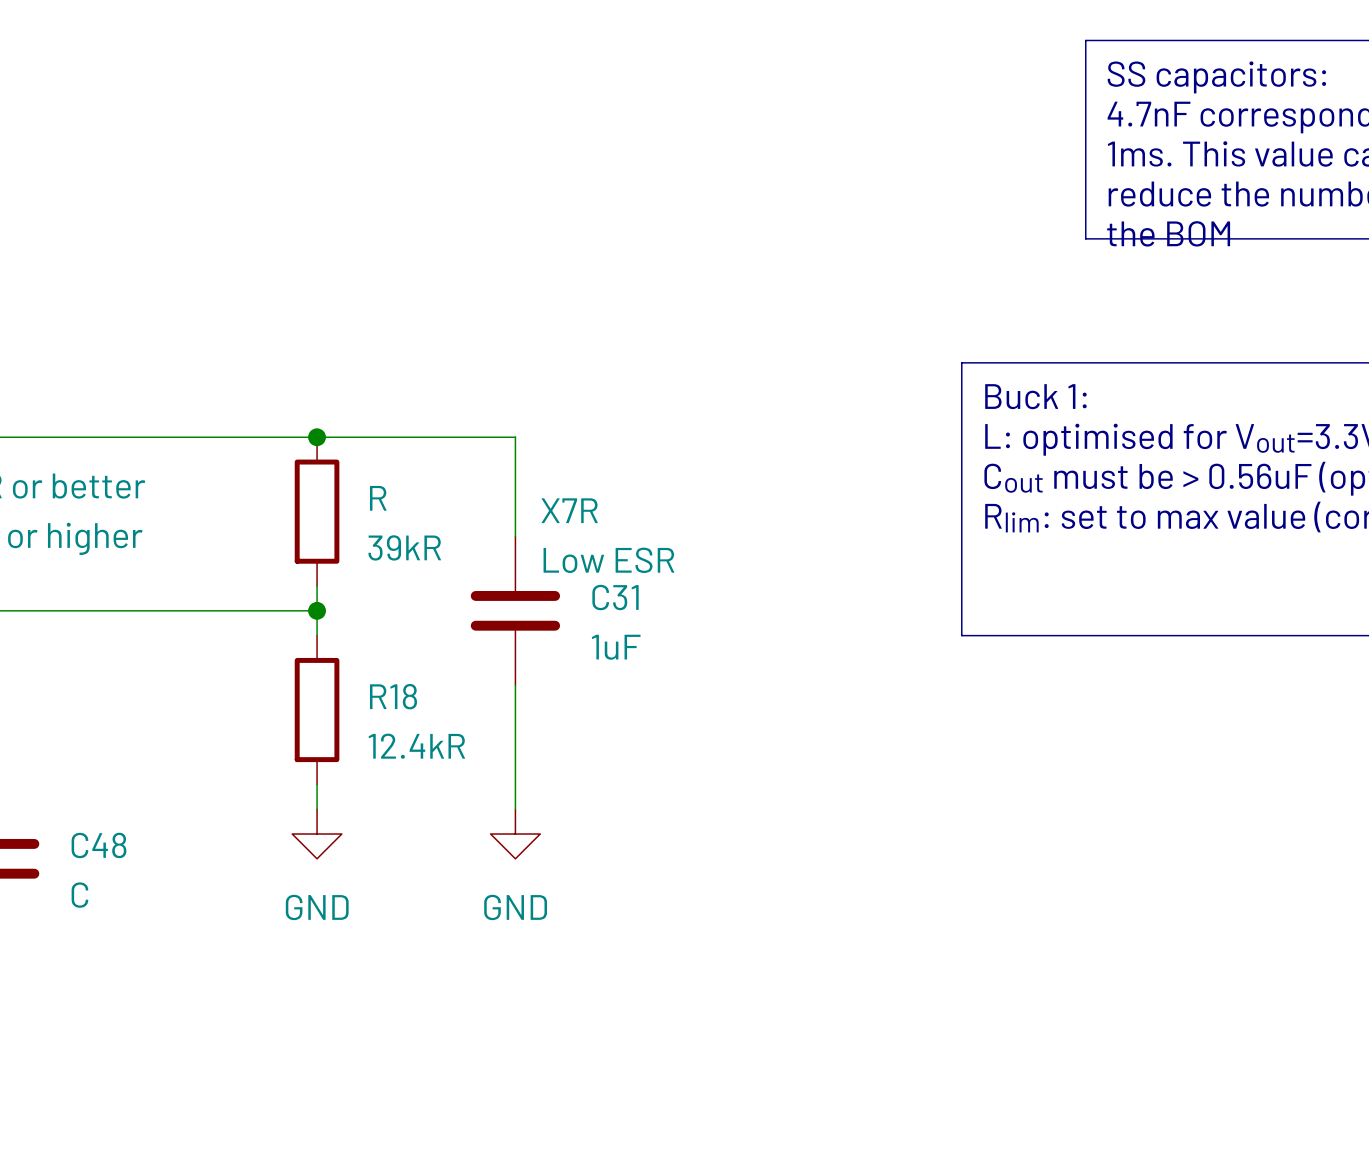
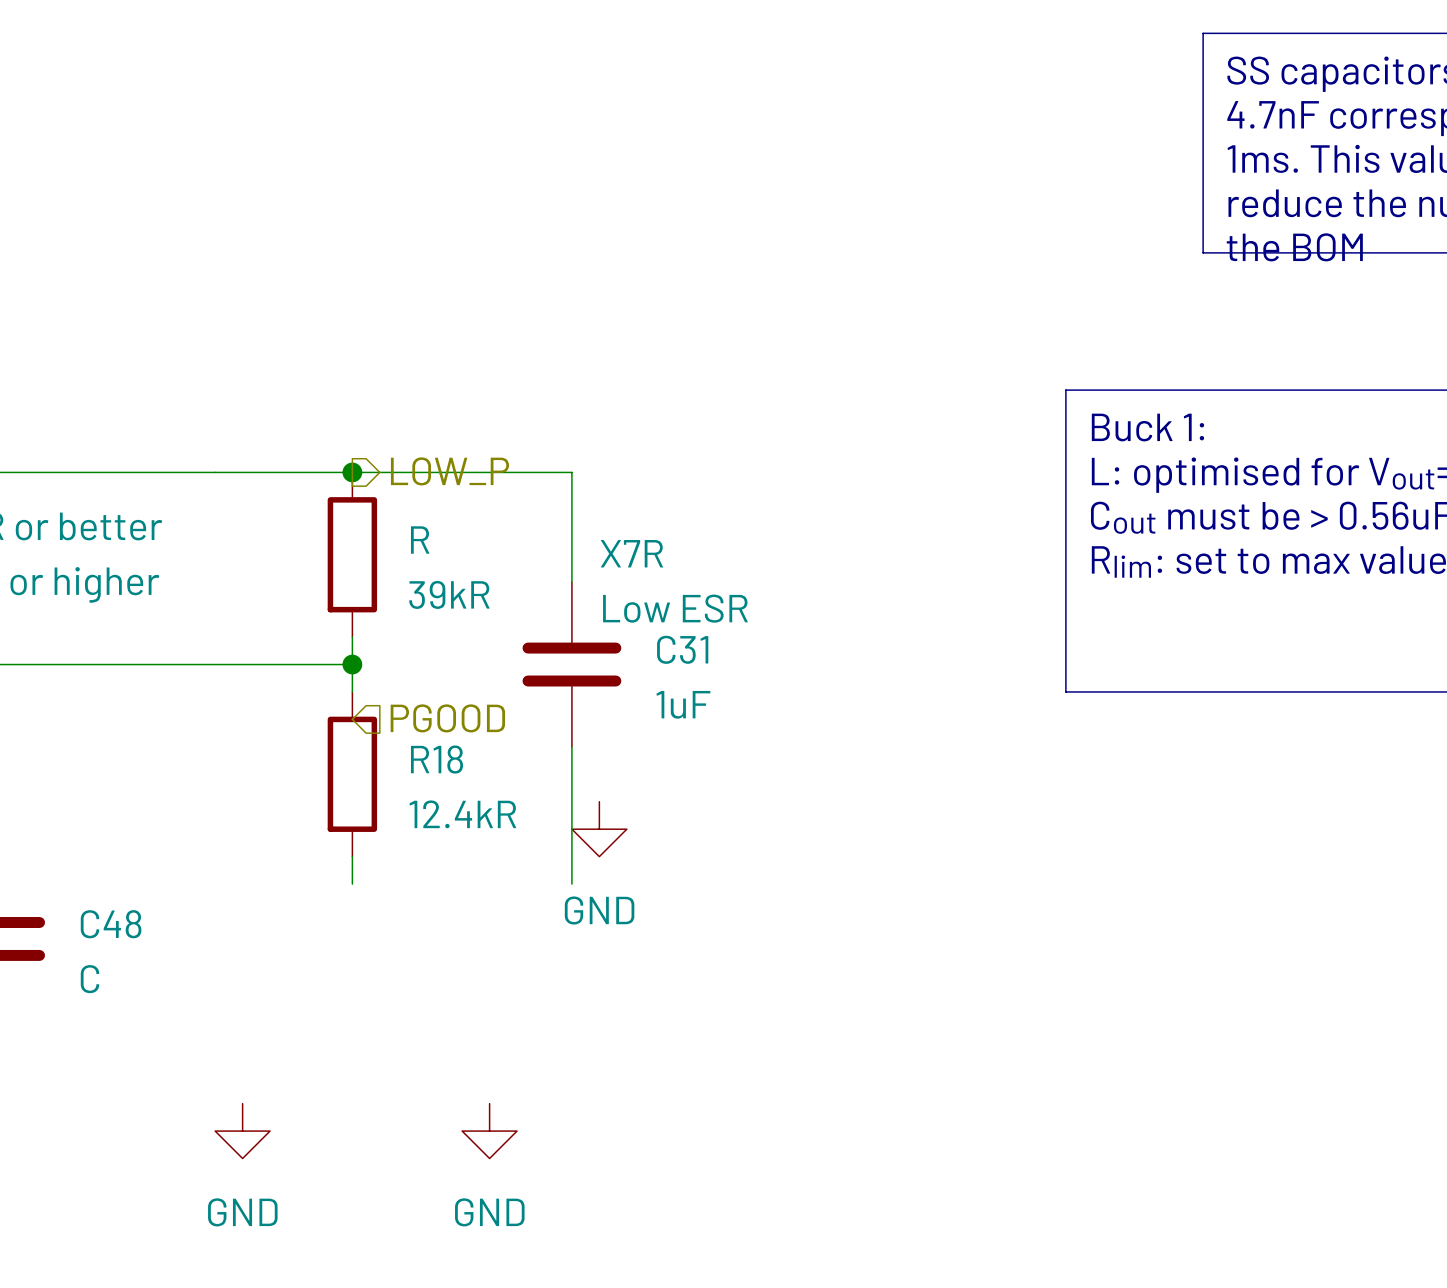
hierarchical label: none -> LOW_P (449, 471)
hierarchical label: none -> PGOOD (447, 718)
power symbol: GND (317, 834) -> none
power symbol position: GND (515, 834) -> GND (599, 829)
power symbol: none -> GND (242, 1131)
power symbol: none -> GND (489, 1131)

